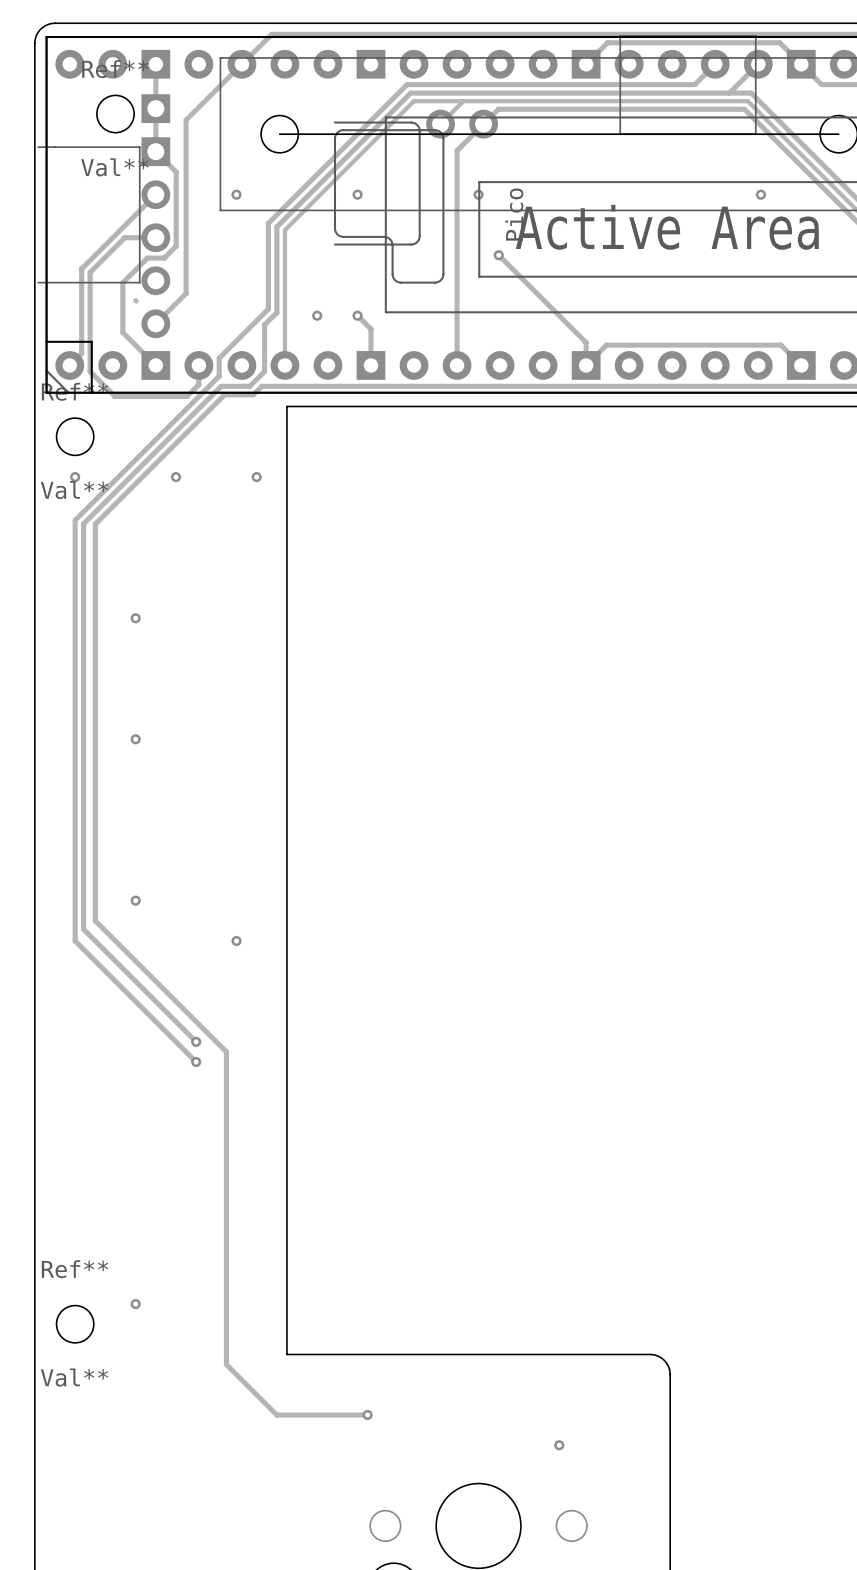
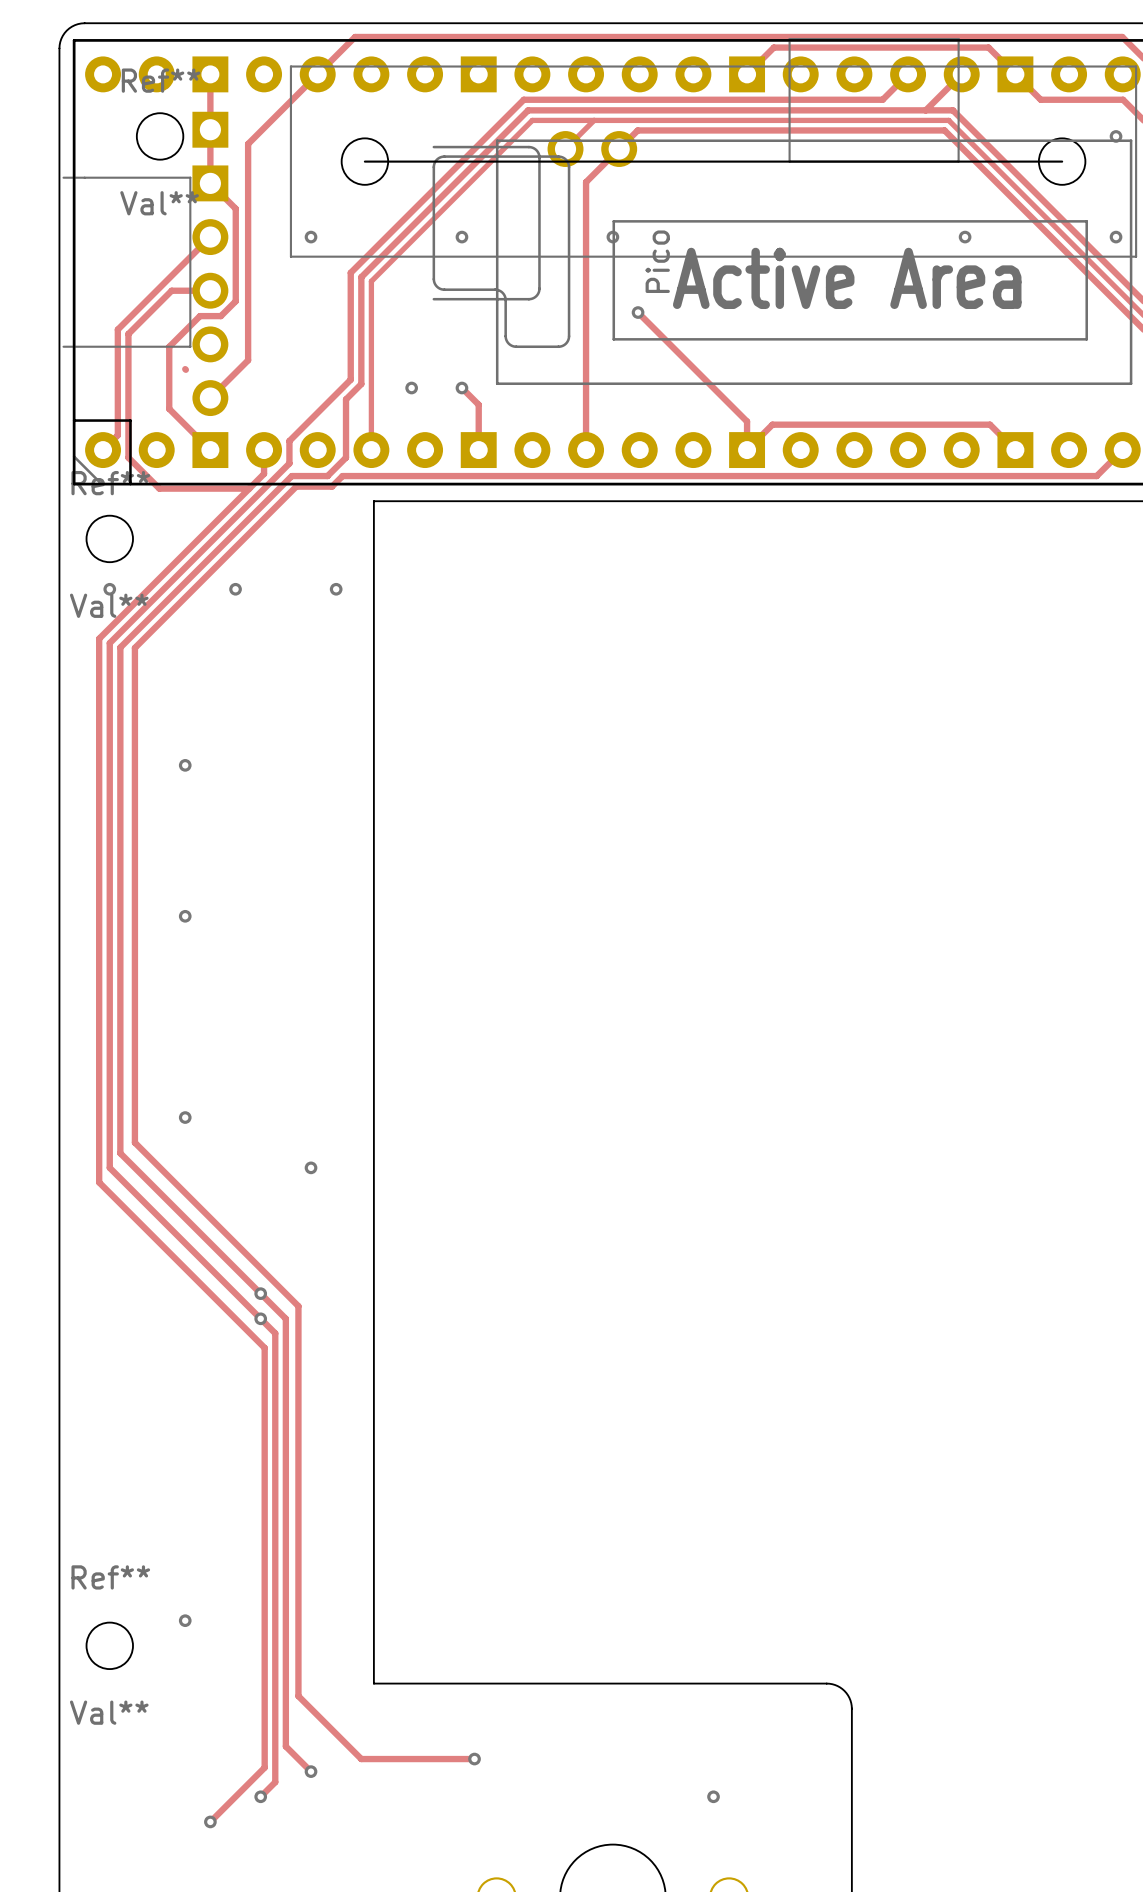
track: none -> (249, 488) (99, 638) (99, 1182) (264, 1347) (264, 1767) (210, 1821)
track: none -> (260, 1293) (285, 1318) (285, 1746) (311, 1771)
track: none -> (260, 1318) (275, 1333) (275, 1782) (260, 1796)
via: none -> (311, 1771)
via: none -> (260, 1796)
via: none -> (210, 1821)

